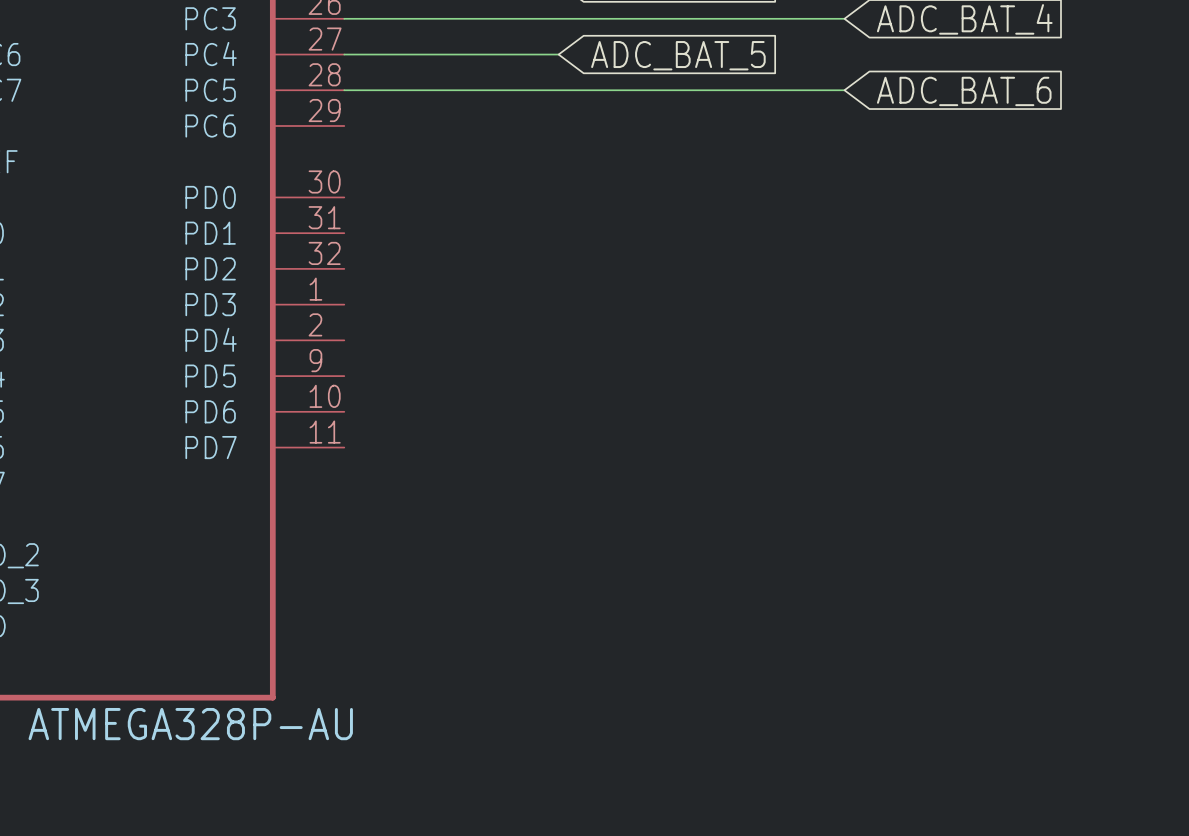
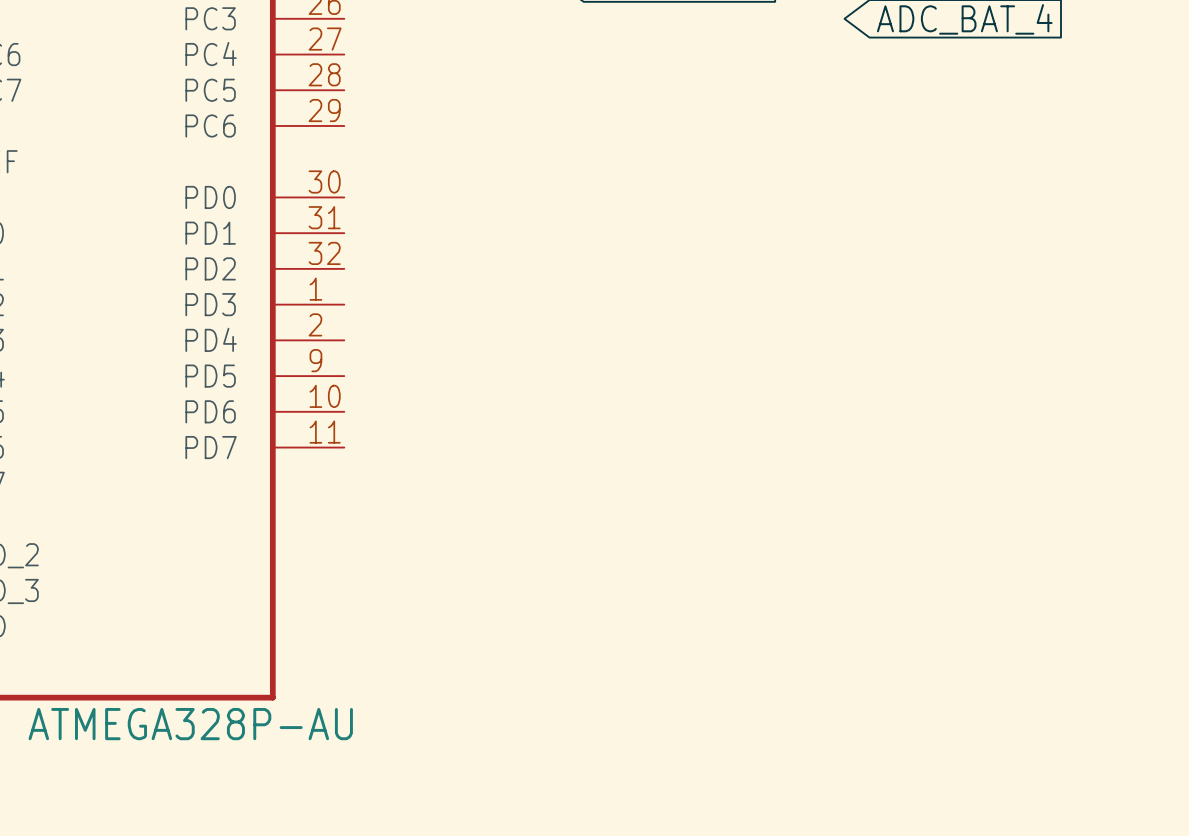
wire: (344, 18) (844, 18) -> none
wire: (344, 54) (558, 54) -> none
global label: ADC_BAT_5 (678, 55) -> none
wire: (344, 90) (844, 90) -> none
global label: ADC_BAT_6 (964, 91) -> none

